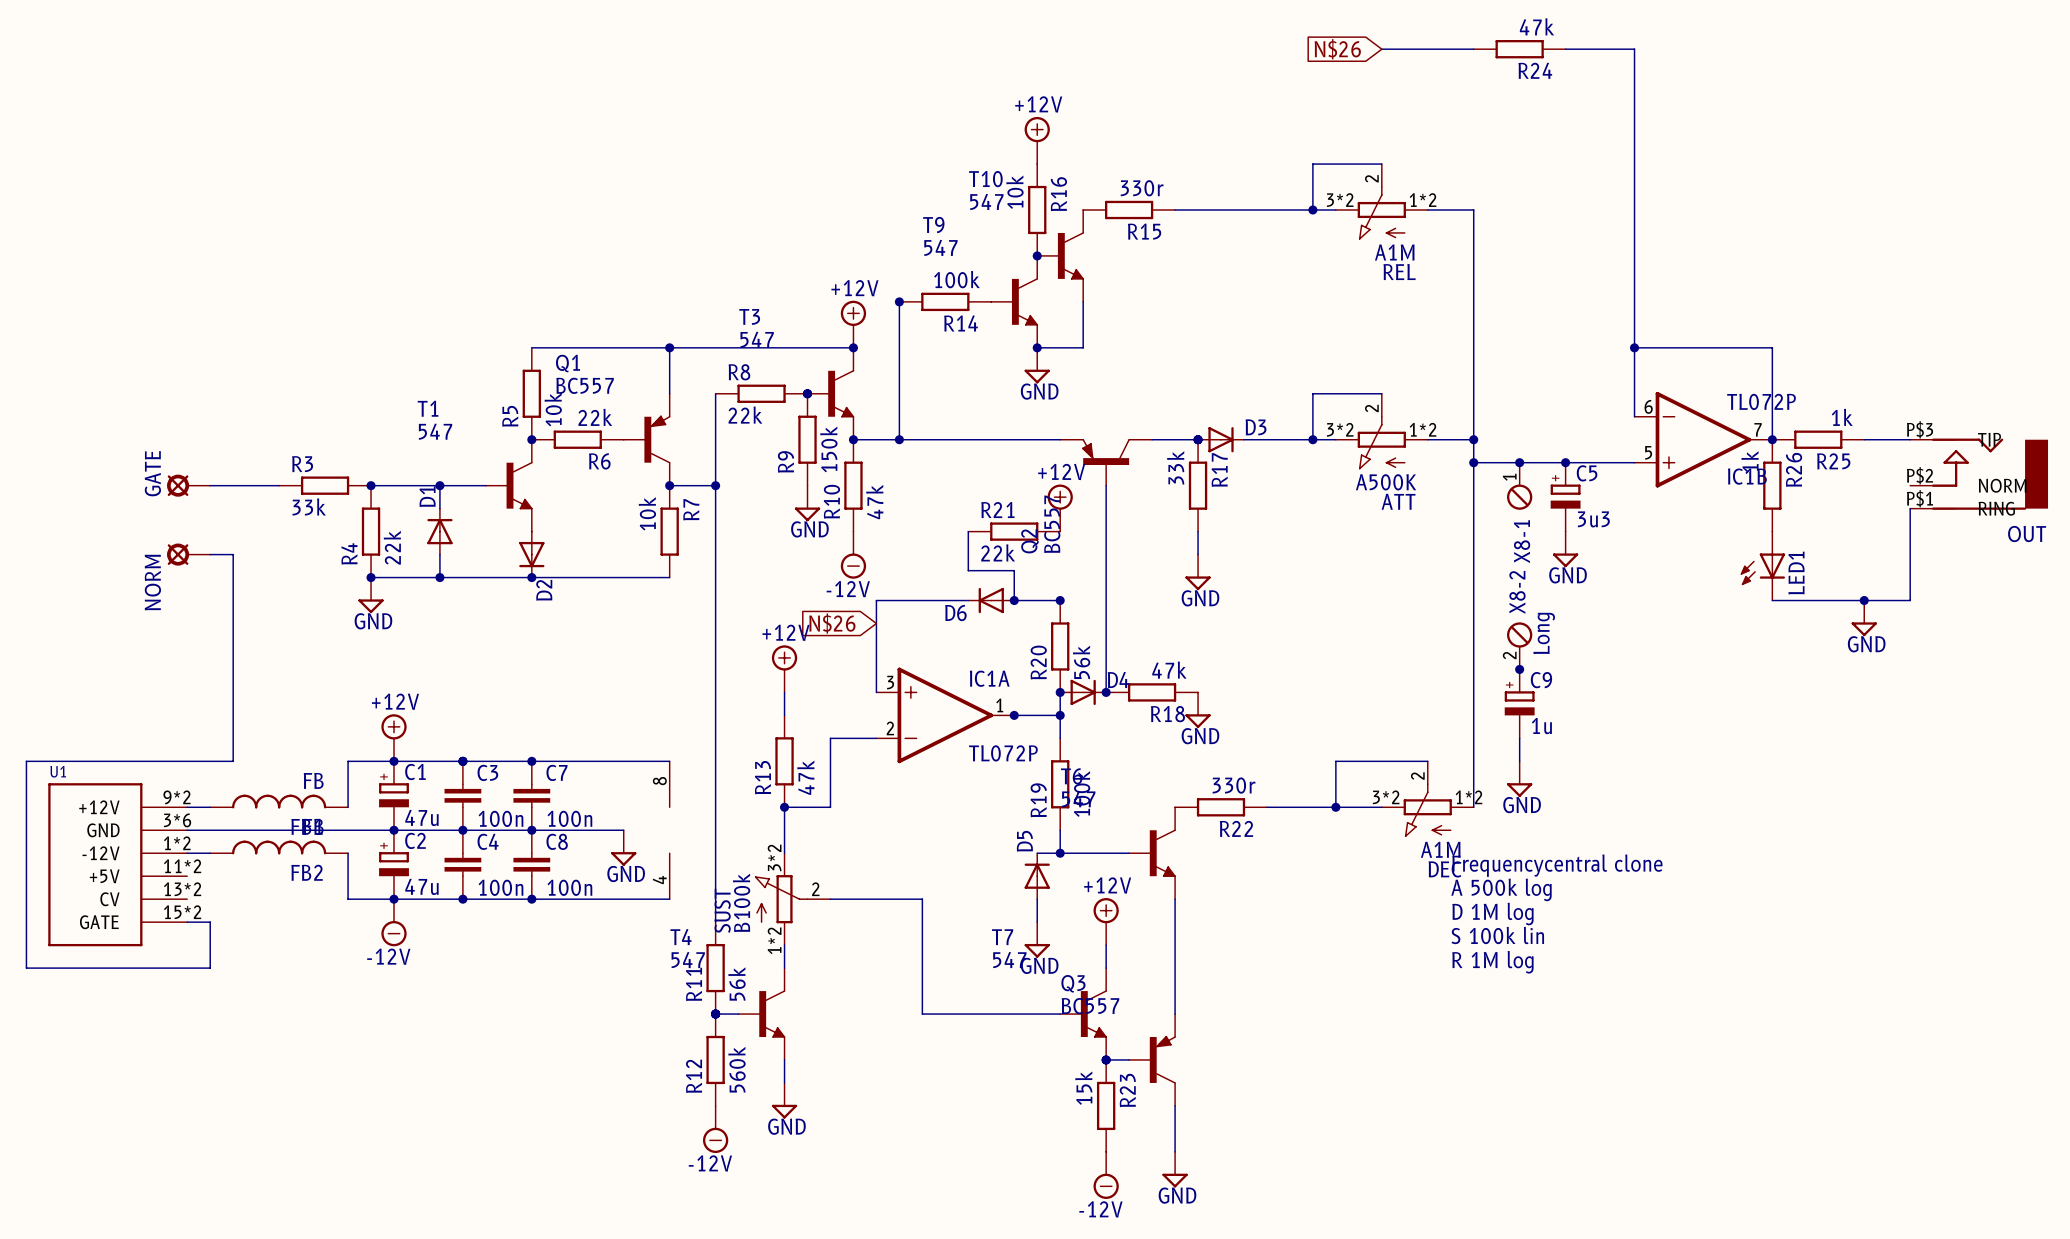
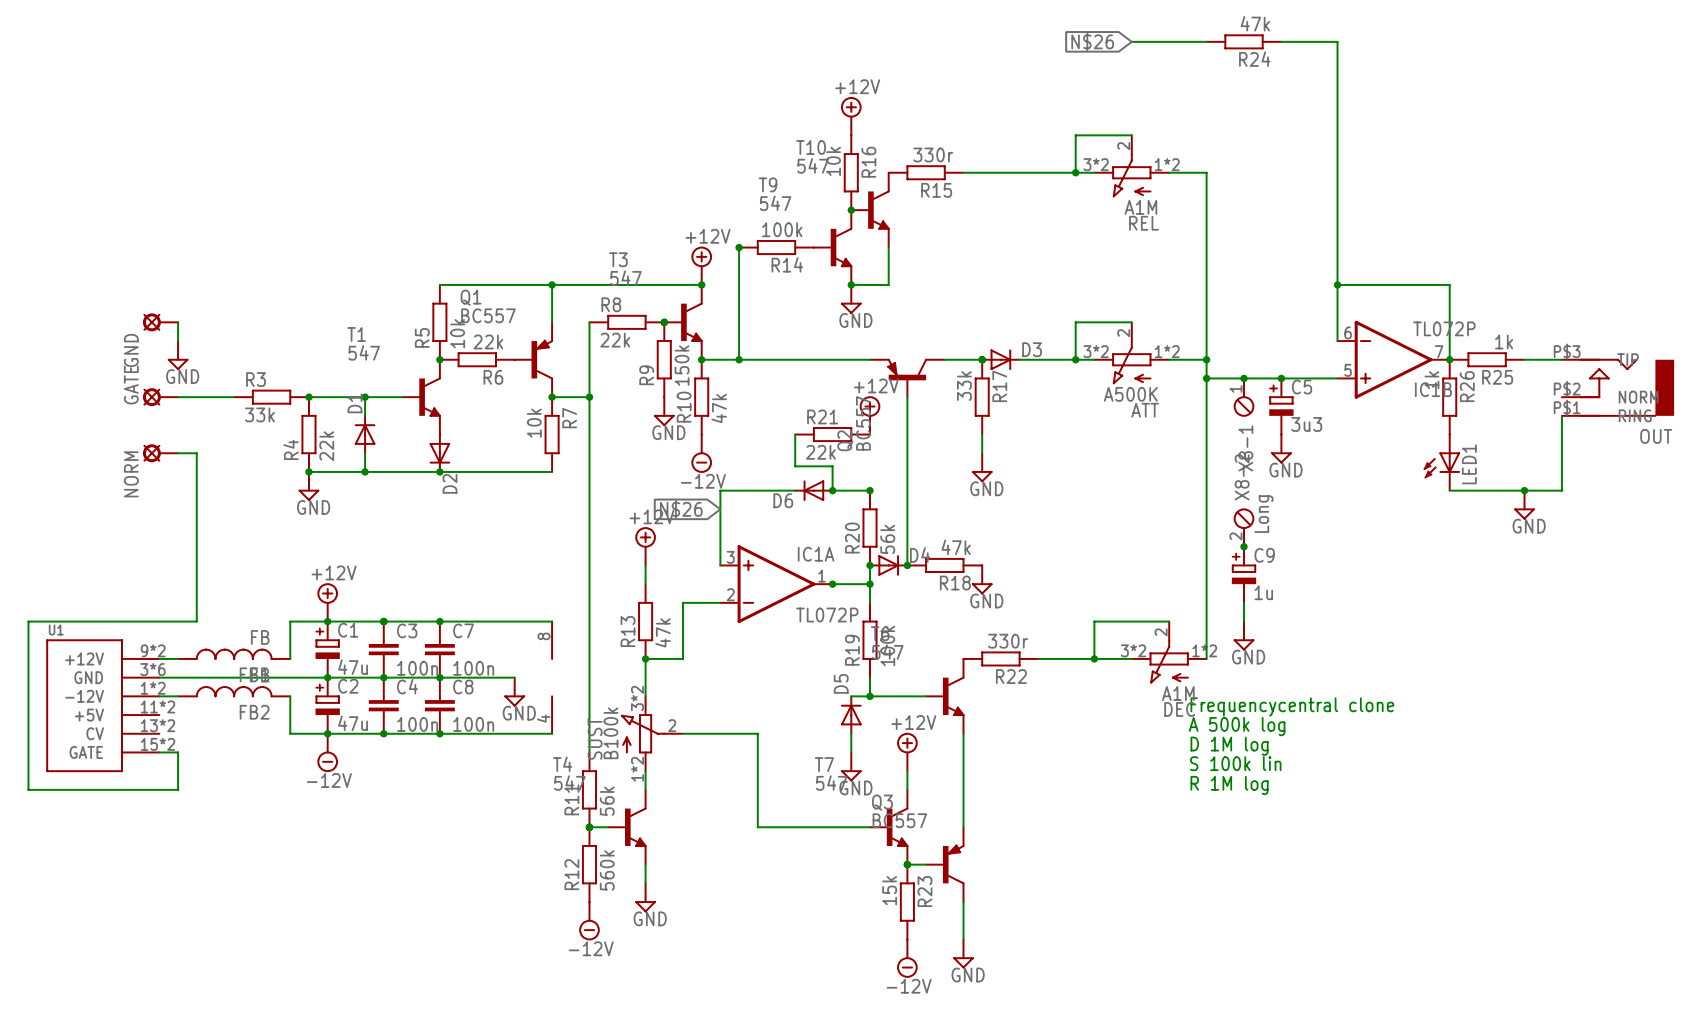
GND: none -> (160, 322)
wire: none -> (178, 322) (178, 341)
power symbol: none -> GND (178, 355)

